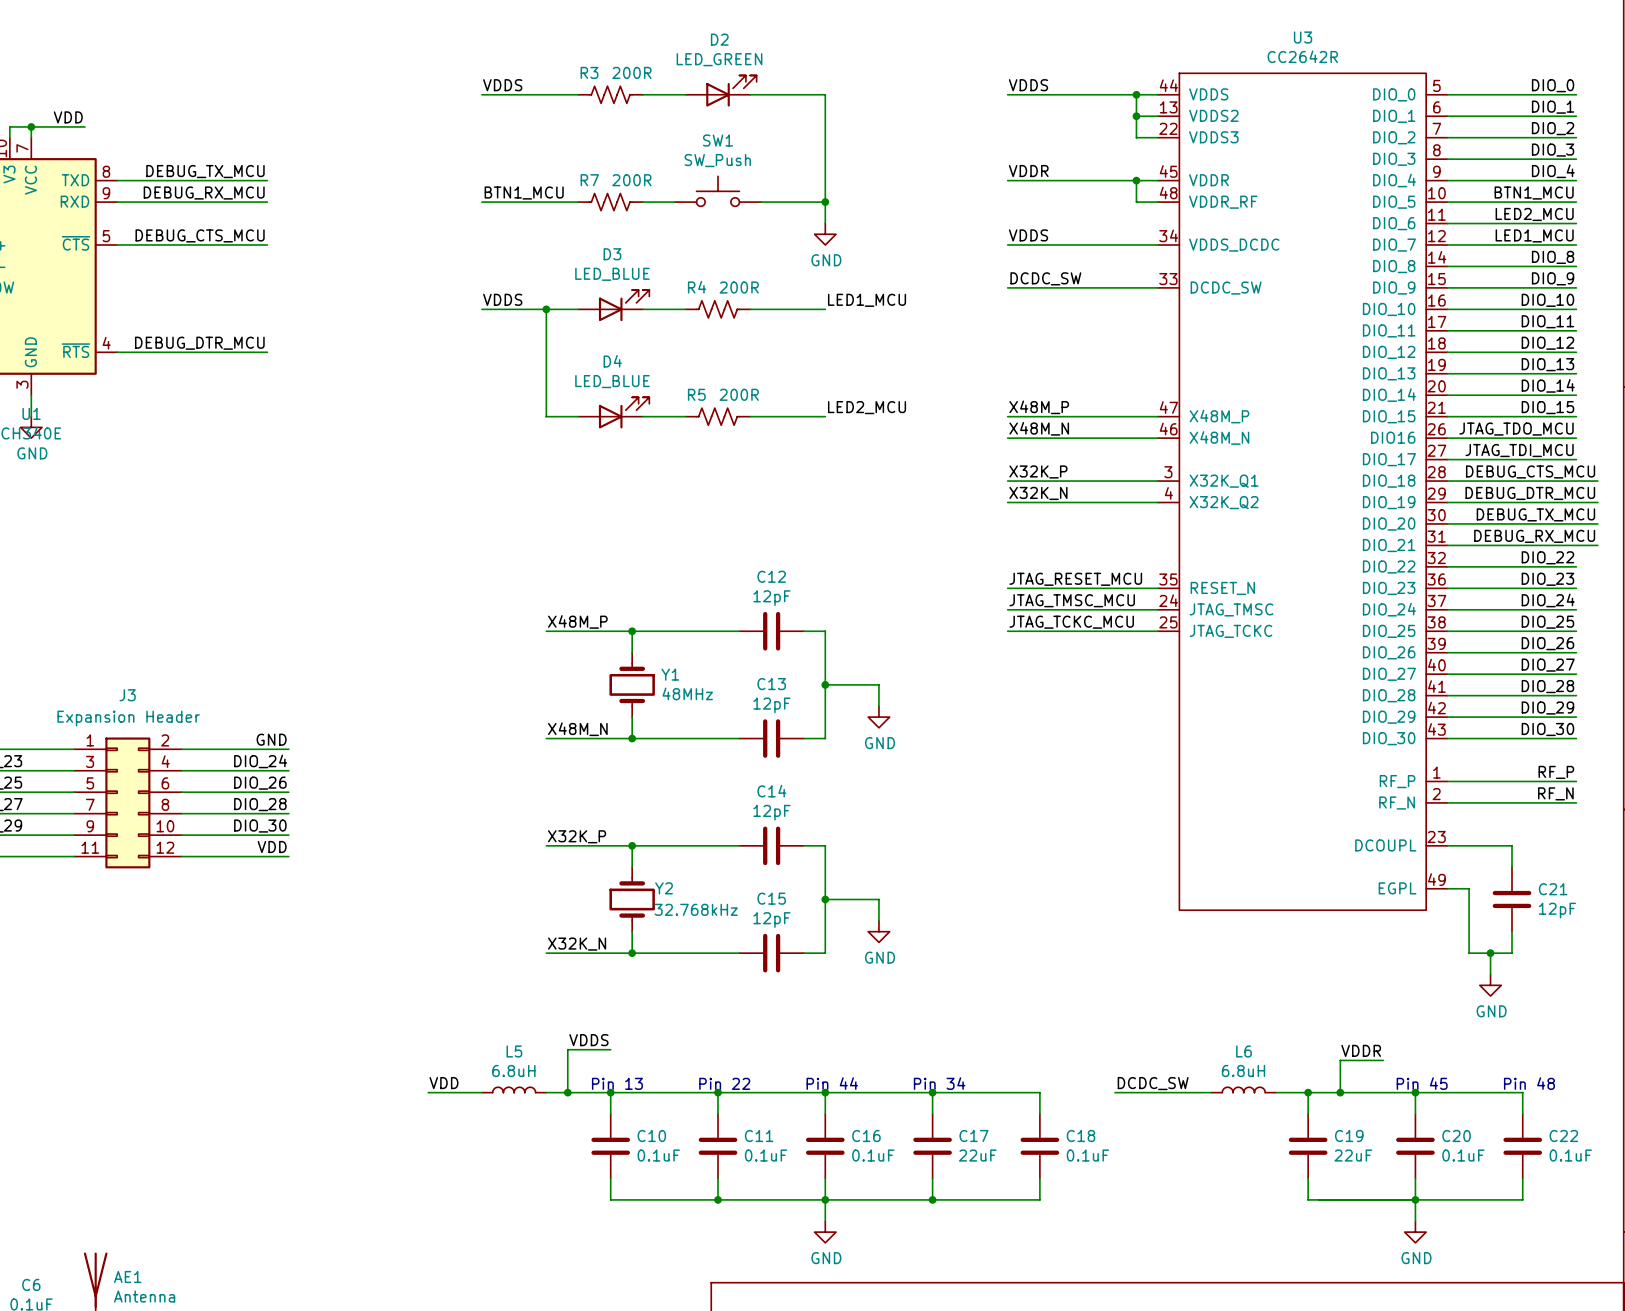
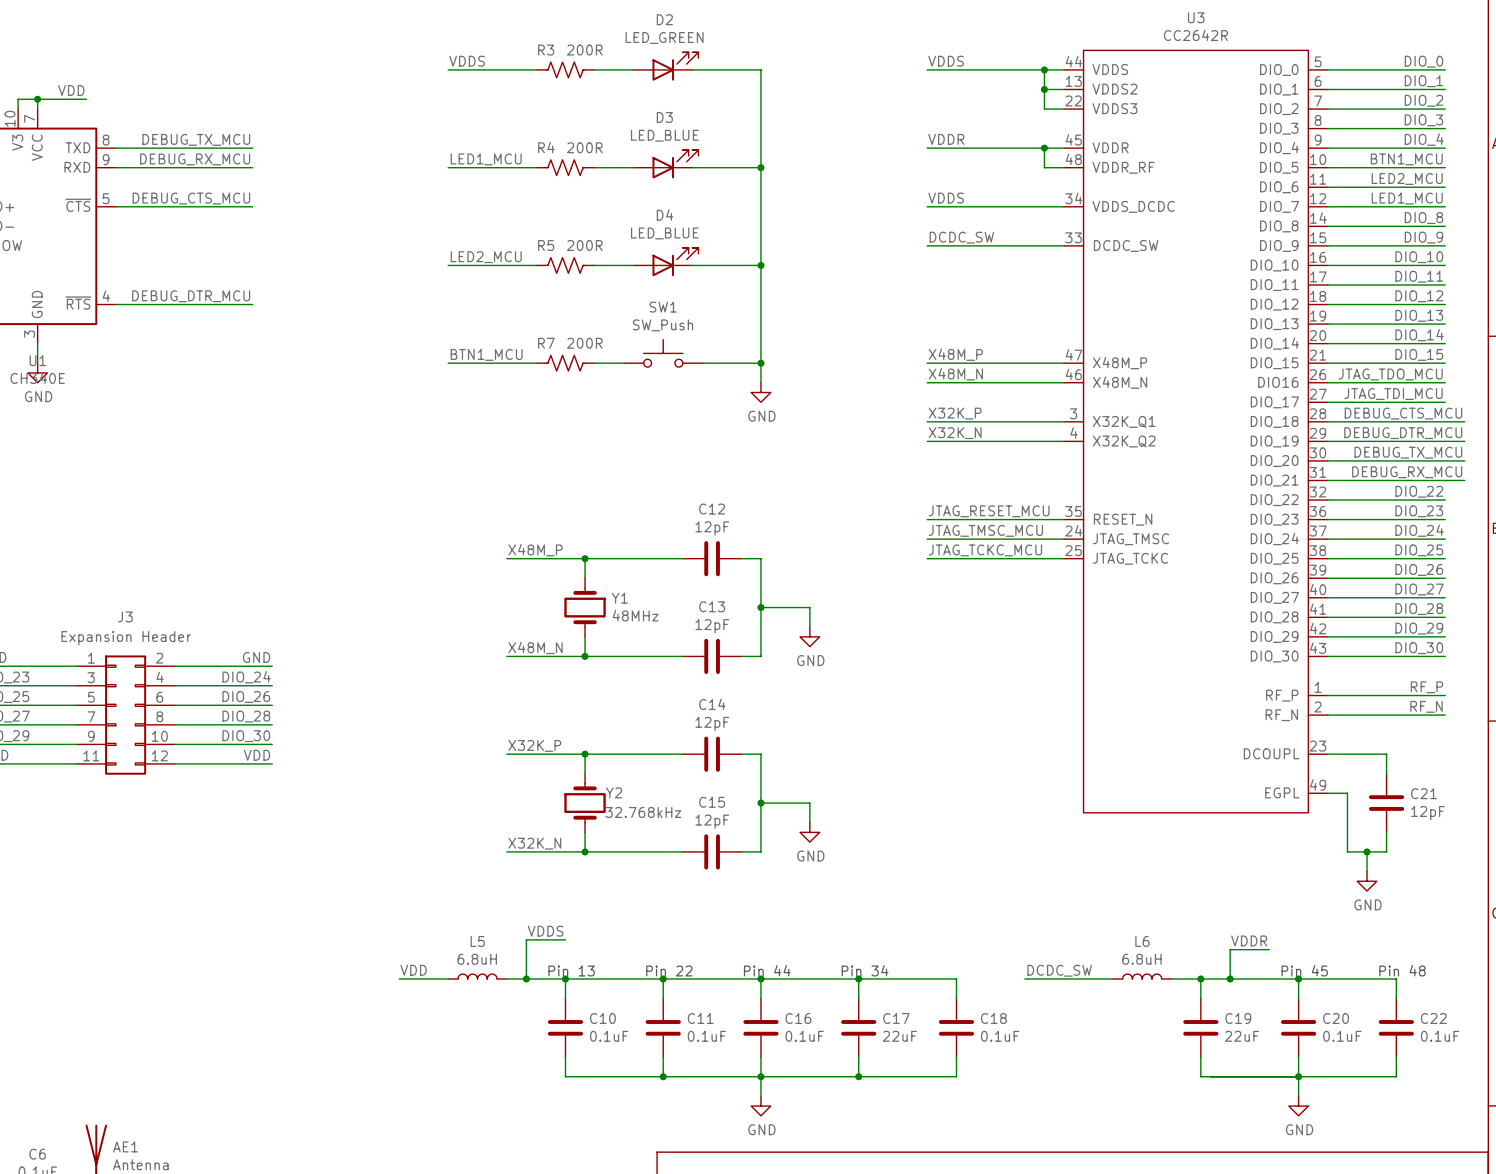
R7 name: R7 (589, 180) -> R4 (546, 147)
SW1 position: (718, 191) -> (663, 353)
label: BTN1_MCU (524, 193) -> LED1_MCU (486, 159)
wire: none -> (760, 187) (760, 382)
power symbol: GND (825, 234) -> none
label: VDDS (502, 299) -> LED2_MCU (486, 257)
label: LED1_MCU (867, 300) -> none
D3 position: (613, 305) -> (666, 164)
wire: (546, 309) (546, 416) -> (448, 363) (506, 363)
junction: (546, 309) -> none
R4: 200R (718, 309) -> none
junction: none -> (760, 265)
label: none -> BTN1_MCU (486, 354)
label: LED2_MCU (867, 407) -> none
D4 position: (613, 412) -> (666, 262)
R7: none -> 200R (565, 363)
R5 position: (718, 416) -> (565, 265)
junction: none -> (760, 363)
power symbol: none -> GND (760, 392)

